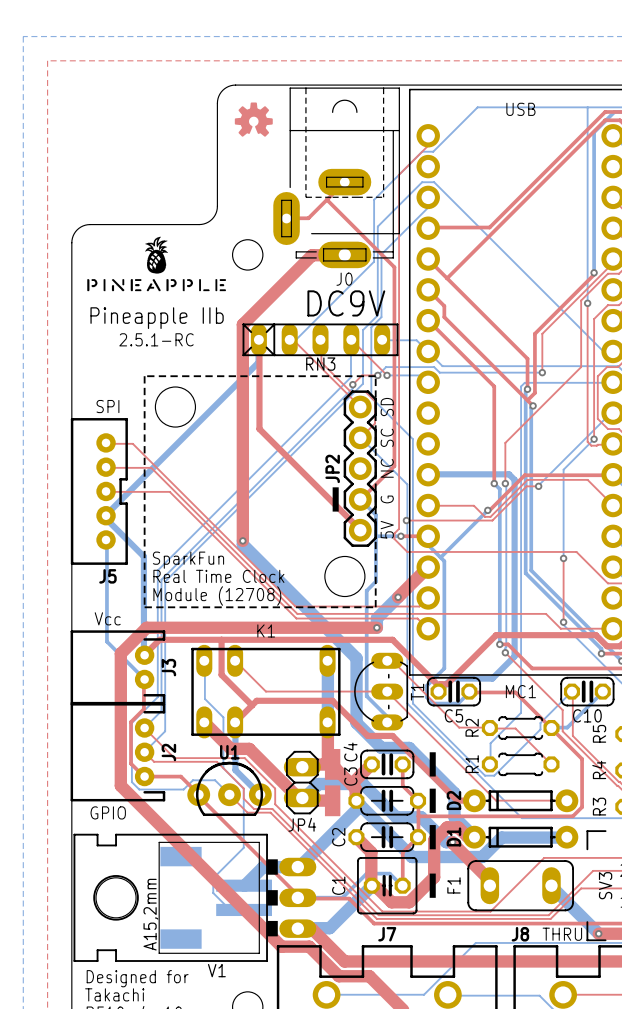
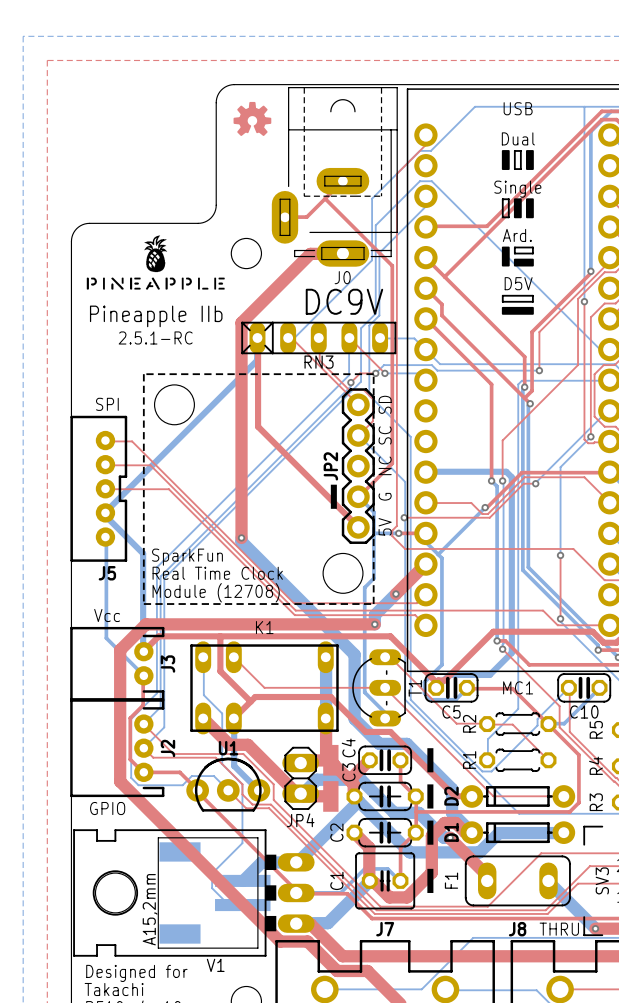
text: none -> Dual (518, 138)
drawing: none -> [501, 150, 510, 170]
drawing: none -> [526, 150, 534, 170]
line: none -> (514, 150) (520, 150) (520, 169) (514, 169) (514, 150)
text: none -> Single (517, 189)
drawing: none -> [513, 198, 534, 219]
line: none -> (502, 199) (502, 217) (508, 217) (508, 199) (502, 199)
text: none -> Ard. (517, 235)
drawing: none -> [501, 246, 534, 267]
line: none -> (514, 247) (514, 253) (532, 253) (532, 247) (514, 247)
text: none -> D5V (518, 283)
line: none -> (502, 295) (502, 301) (532, 301) (532, 295) (502, 295)
drawing: none -> [501, 306, 534, 315]

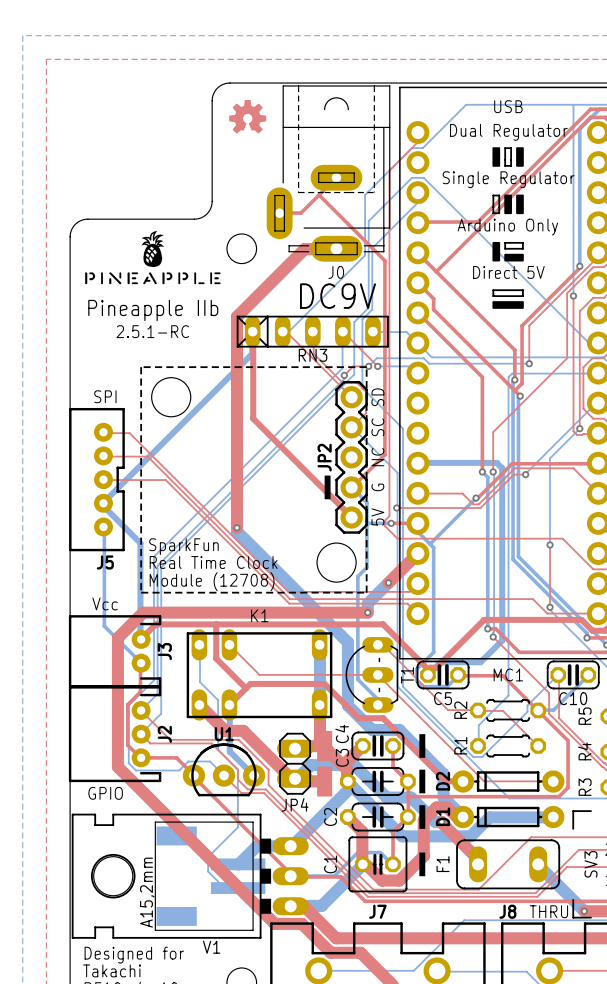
text: Dual (518, 138) -> Dual Regulator (508, 132)
text: Single (517, 189) -> Single Regulator (508, 179)
text: Ard. (517, 235) -> Arduino Only (507, 227)
text: D5V (518, 283) -> Direct 5V (508, 272)

